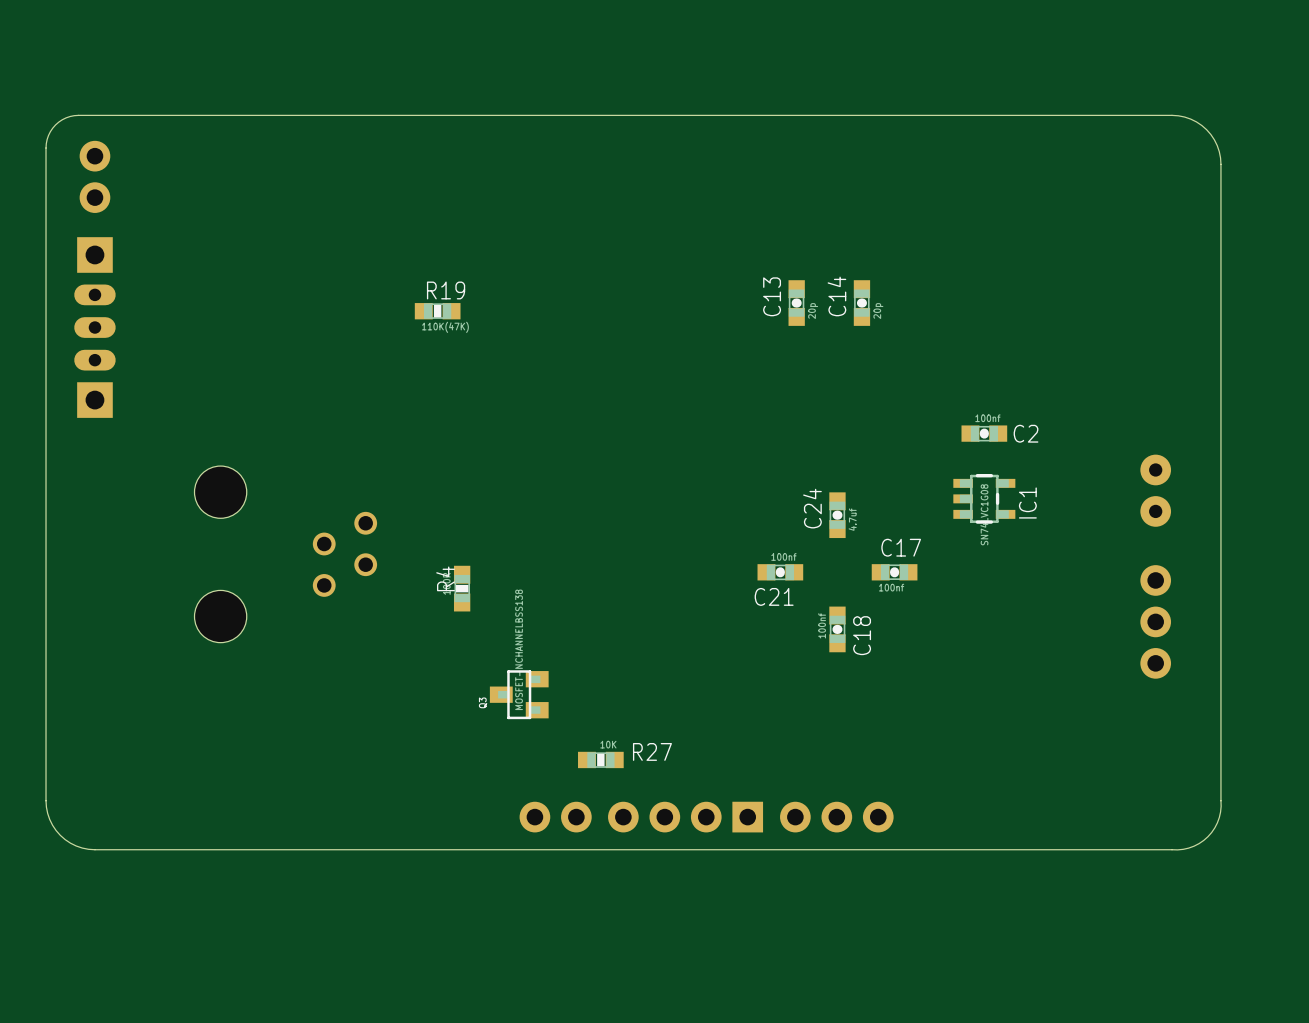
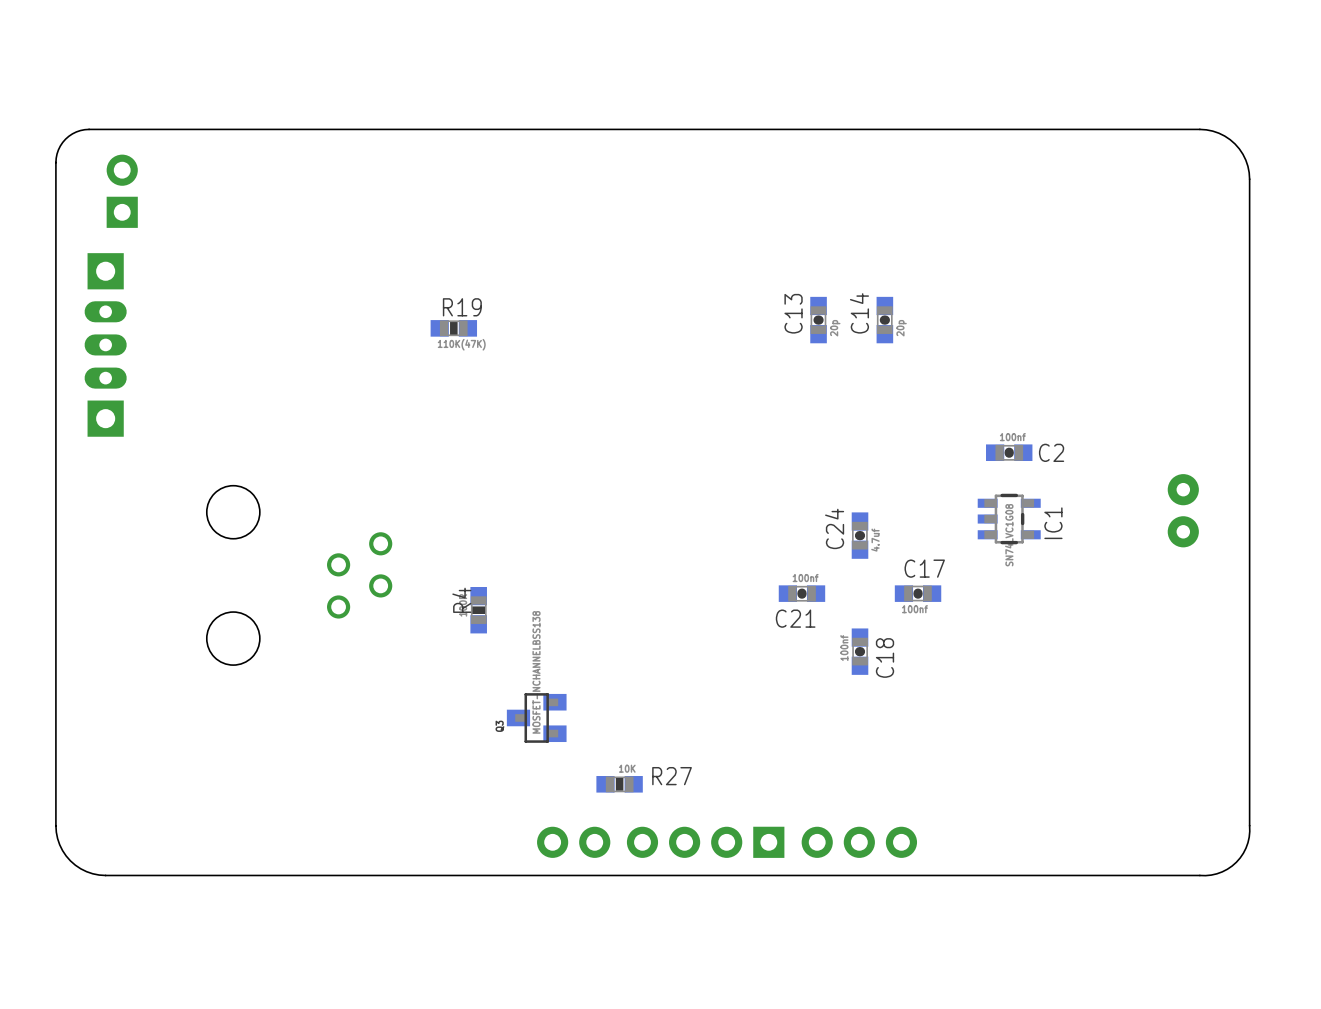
part: (94, 176) -> none
part: none -> (122, 191)
part: (1155, 621) -> none

